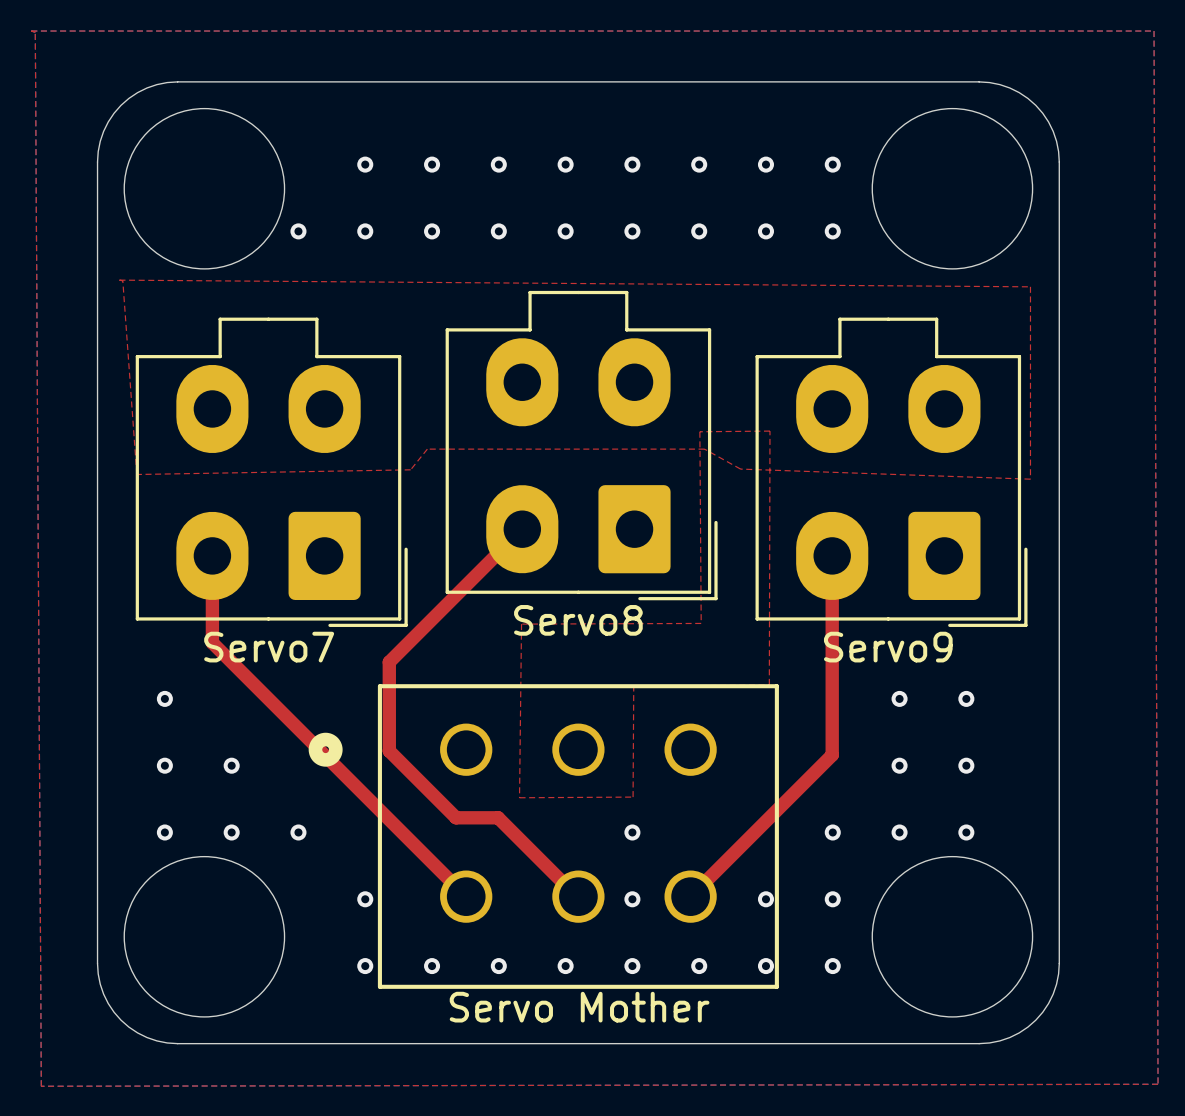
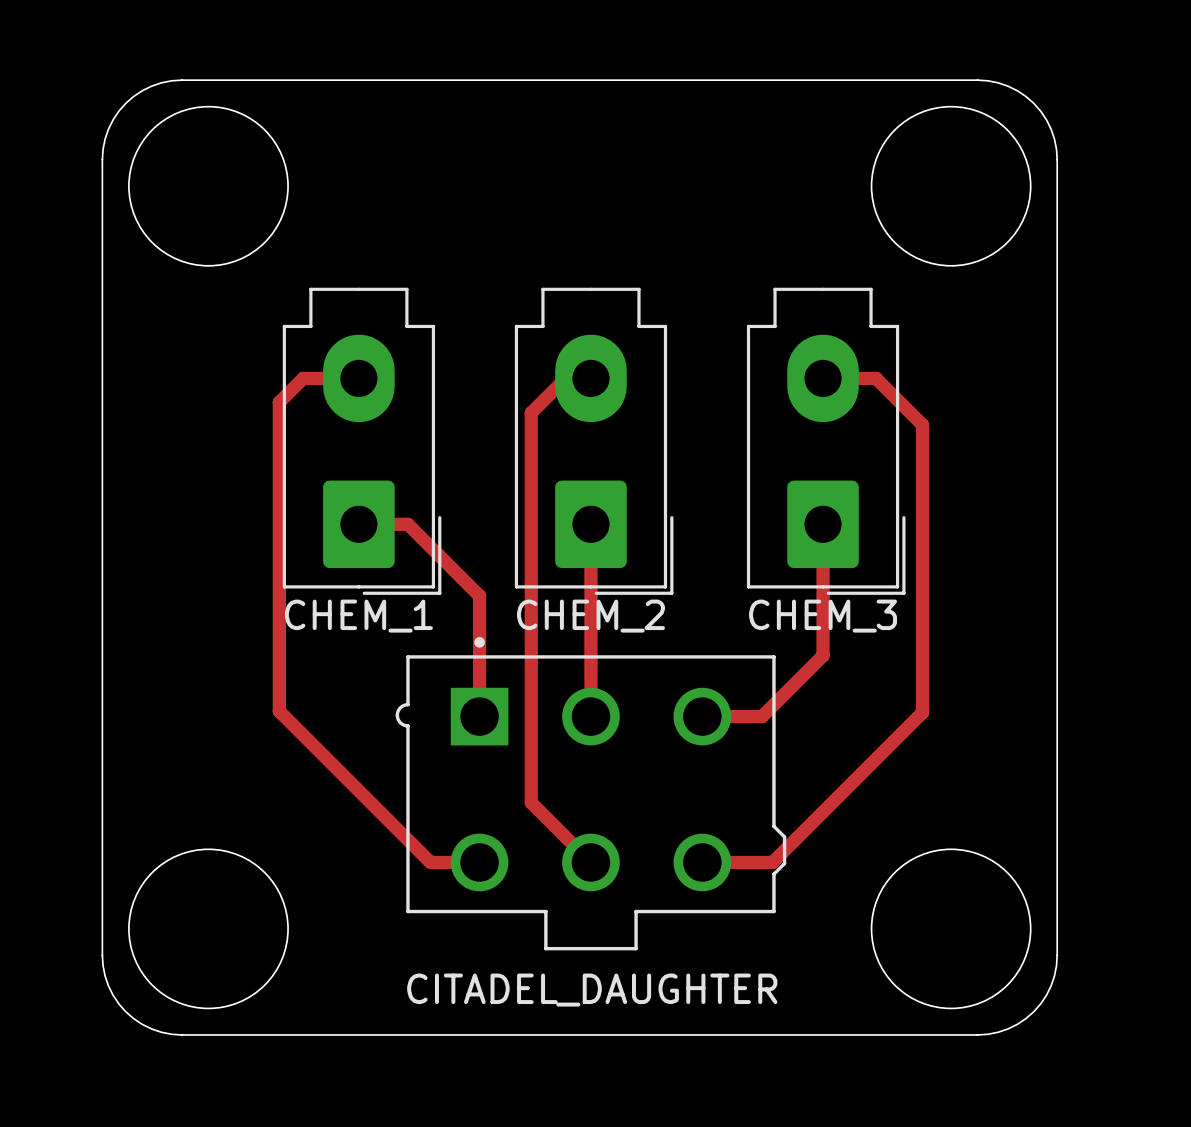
top zone outline: (31, 31) (1154, 31) (1158, 1084) (41, 1086) (35, 32) (31, 31) -> none
via: (365, 164) -> none
via: (432, 164) -> none
via: (498, 164) -> none
via: (565, 164) -> none
via: (632, 164) -> none
via: (699, 164) -> none
via: (765, 164) -> none
via: (832, 164) -> none
via: (298, 231) -> none
via: (365, 231) -> none
via: (432, 231) -> none
via: (498, 231) -> none
via: (565, 231) -> none
via: (632, 231) -> none
via: (699, 231) -> none
via: (765, 231) -> none
via: (832, 231) -> none
top zone outline: (119, 280) (1030, 286) (1030, 479) (740, 469) (704, 449) (427, 449) (410, 469) (136, 474) (122, 280) (119, 280) -> none
top track: none -> (358, 378) (303, 378) (279, 402) (279, 711) (430, 862) (479, 862)
top track: none -> (590, 378) (565, 378) (531, 412) (531, 802) (590, 862)
top track: none -> (823, 378) (876, 378) (922, 424) (922, 712) (772, 862) (702, 862)
top zone outline: (769, 431) (769, 684) (633, 686) (633, 797) (519, 797) (521, 624) (701, 623) (699, 431) (769, 431) -> none
CHEM_1: none -> (362, 441)
Servo8: (581, 445) -> none
CHEM_2: none -> (594, 441)
CHEM_3: none -> (826, 441)
Servo7: (271, 472) -> none
Servo9: (891, 472) -> none
top track: none -> (358, 524) (407, 524) (479, 595) (479, 716)
top track: (522, 529) (389, 662) (389, 751) (456, 817) (498, 817) (578, 896) -> none
top track: none -> (590, 524) (590, 716)
top track: none -> (823, 524) (823, 655) (762, 716) (702, 716)
top track: (212, 555) (212, 642) (466, 896) -> none
top track: (832, 555) (832, 755) (690, 896) -> none
via: (164, 698) -> none
via: (899, 698) -> none
via: (966, 698) -> none
via: (164, 765) -> none
via: (231, 765) -> none
via: (899, 765) -> none
via: (966, 765) -> none
CITADEL_DAUGHTER: none -> (590, 793)
via: (164, 832) -> none
via: (231, 832) -> none
via: (298, 832) -> none
via: (632, 832) -> none
via: (832, 832) -> none
via: (899, 832) -> none
via: (966, 832) -> none
Servo Mother: (543, 836) -> none
via: (365, 899) -> none
via: (632, 899) -> none
via: (765, 899) -> none
via: (832, 899) -> none
via: (365, 966) -> none
via: (432, 966) -> none
via: (498, 966) -> none
via: (565, 966) -> none
via: (632, 966) -> none
via: (699, 966) -> none
via: (765, 966) -> none
via: (832, 966) -> none

